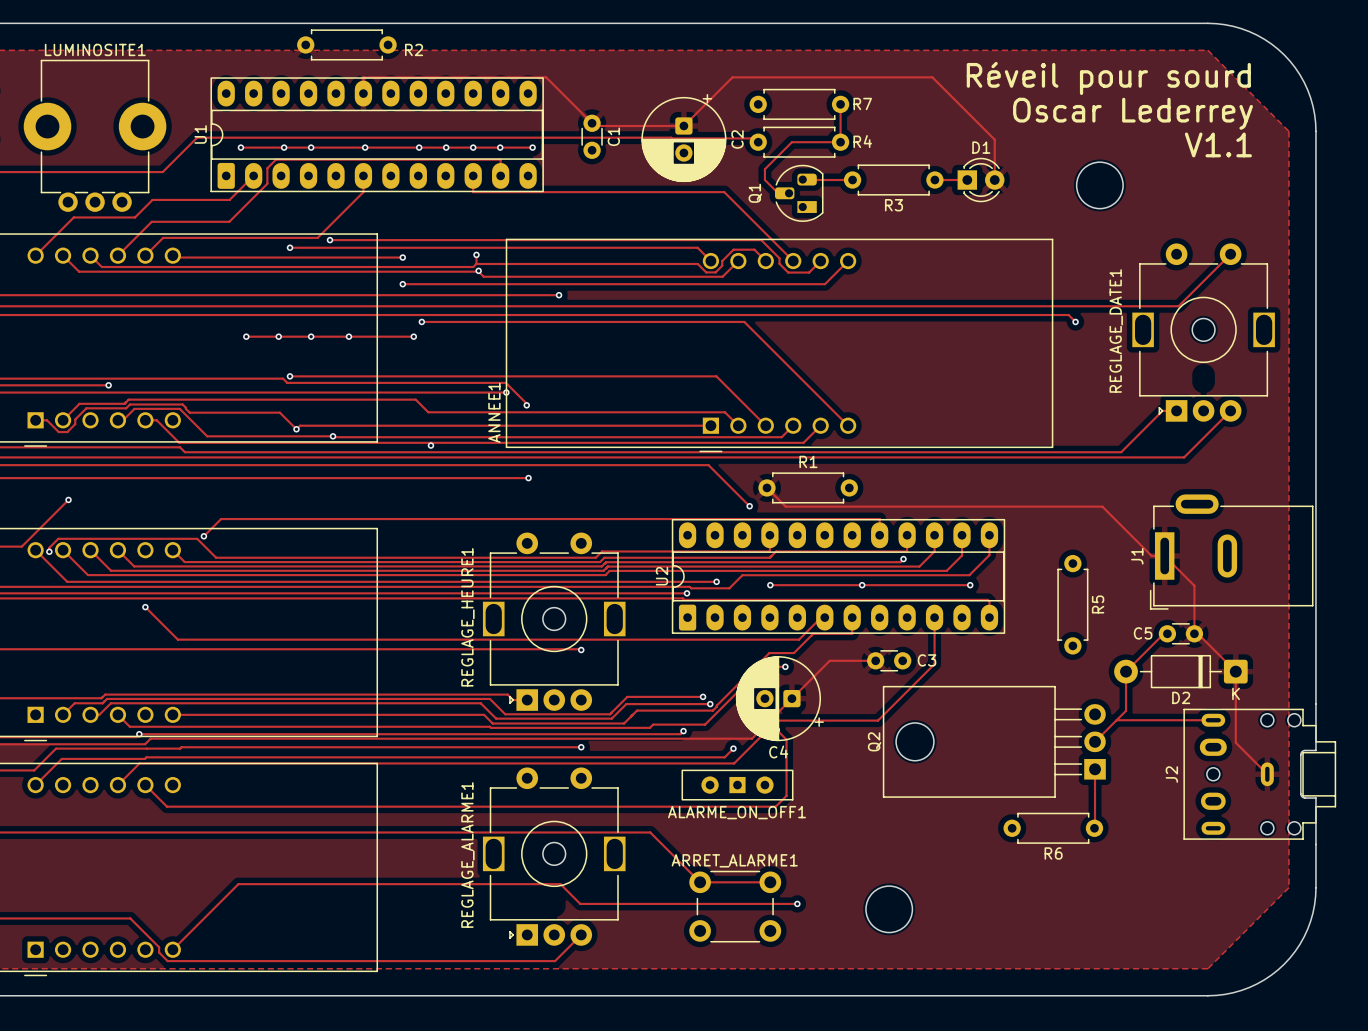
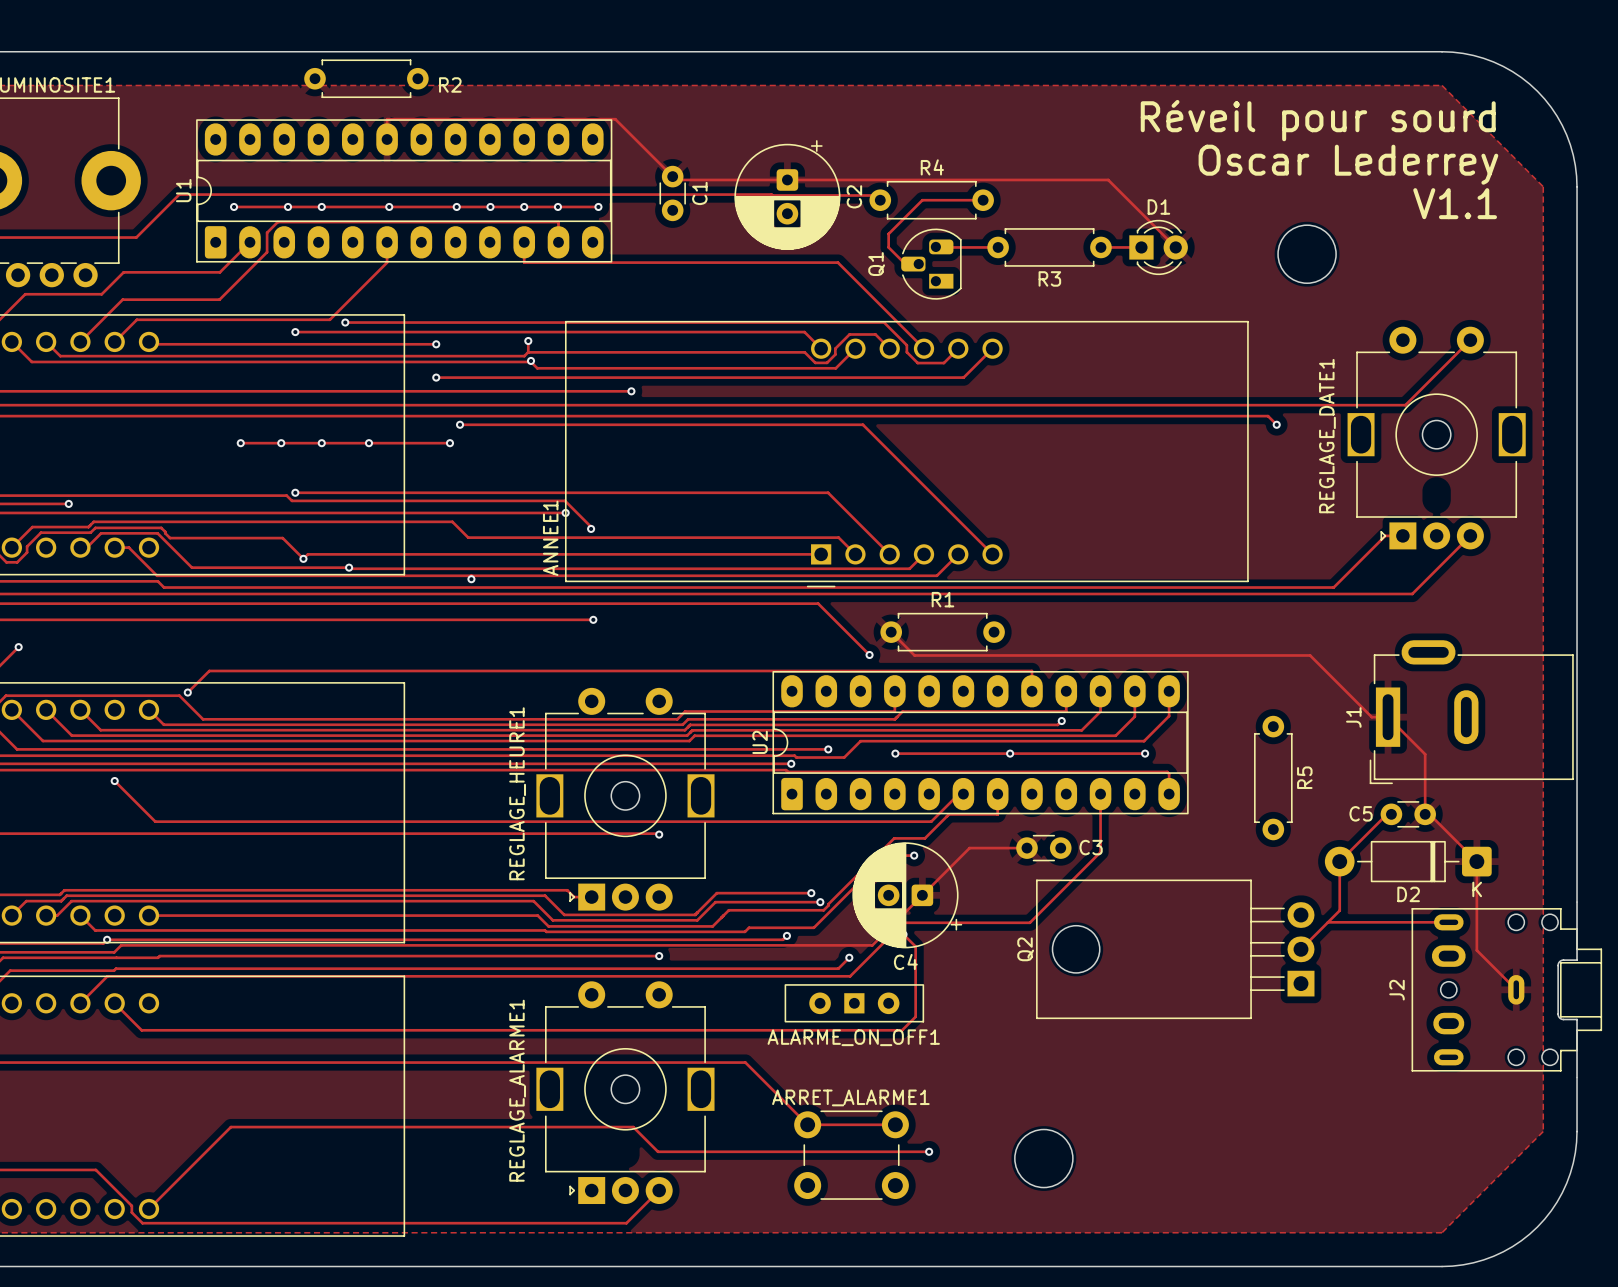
R7: (799, 104) -> none
track: (840, 104) (840, 142) -> none
track: (683, 125) (732, 77) (932, 77) (994, 139) (994, 180) -> (787, 179) (1108, 179) (1175, 247)
R4 name position: R4 (862, 141) -> R4 (932, 167)
track: (1095, 769) (1094, 828) -> none
R6: (1053, 828) -> none

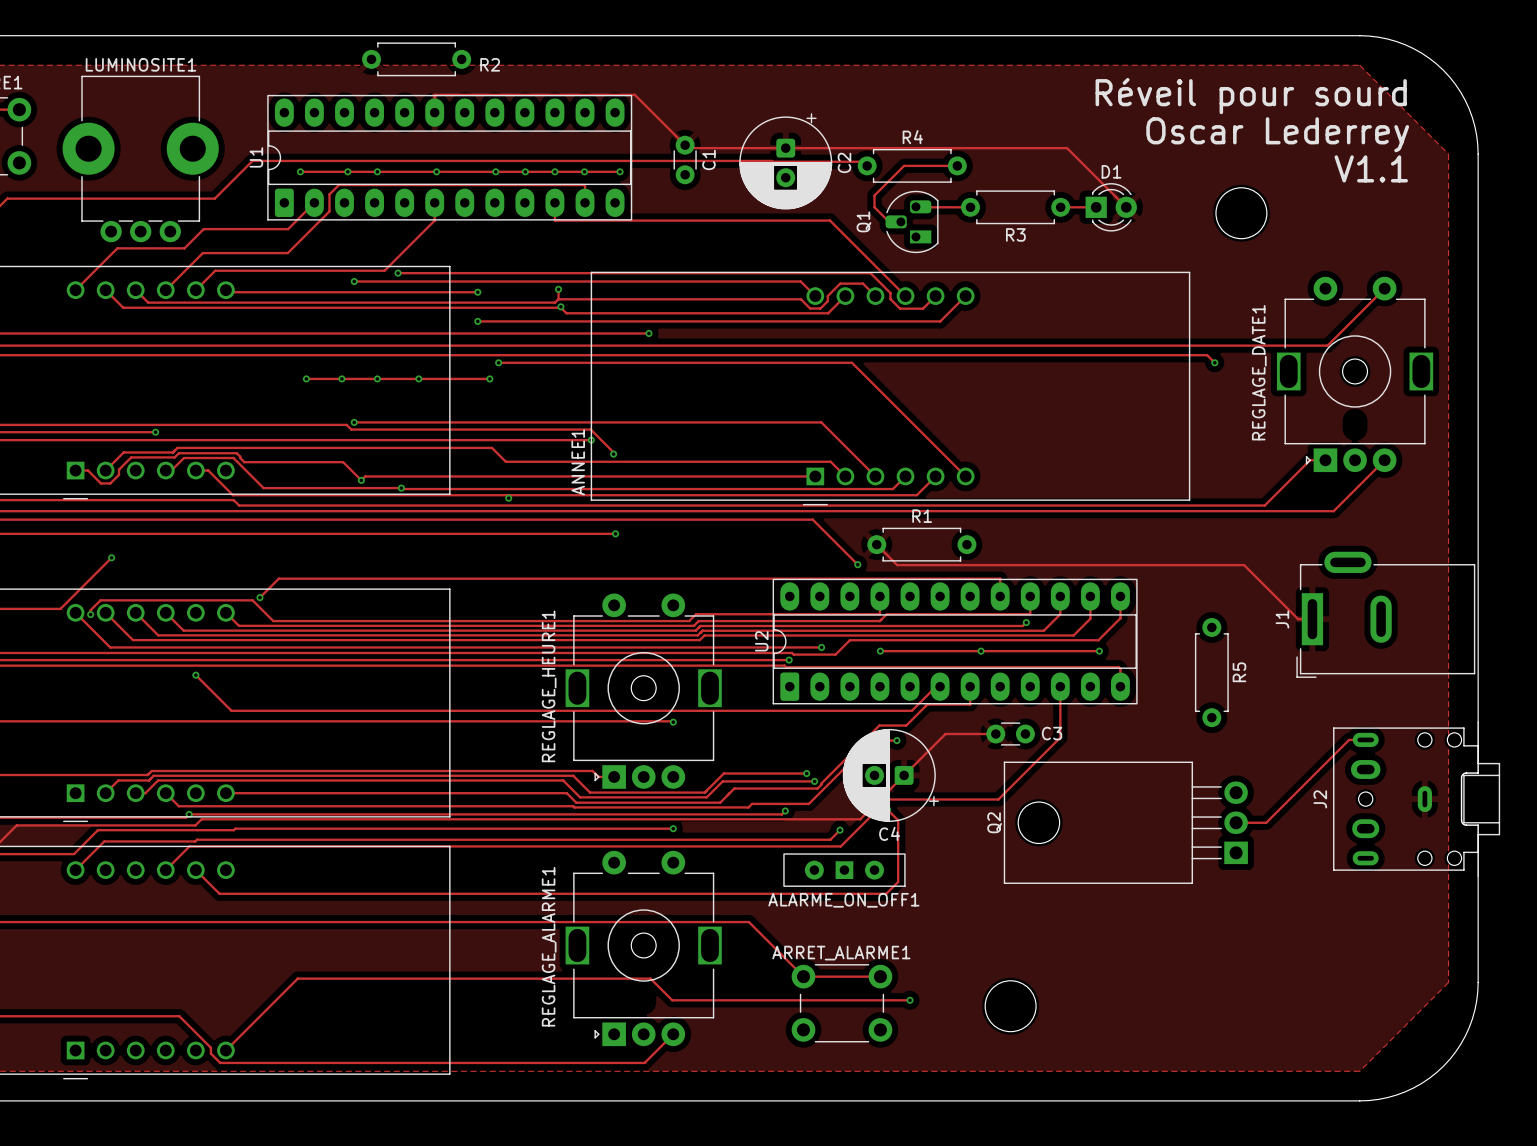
track: (1388, 717) (1425, 754) (1425, 814) (1429, 814) (1476, 861) (1476, 950) (1516, 989) -> none
track: (1391, 814) (1386, 814) (1339, 861) (1339, 910) (1300, 949) -> none
C5: (1408, 814) -> none
board edge: (1577, 834) (1577, 902) -> (1478, 876) (1478, 935)
track: none -> (1365, 739) (1349, 739) (1266, 822) (1238, 822)
D2: (1408, 861) -> none
track: (1327, 922) (1448, 922) -> none
J2 position: (1506, 989) -> (1416, 799)

